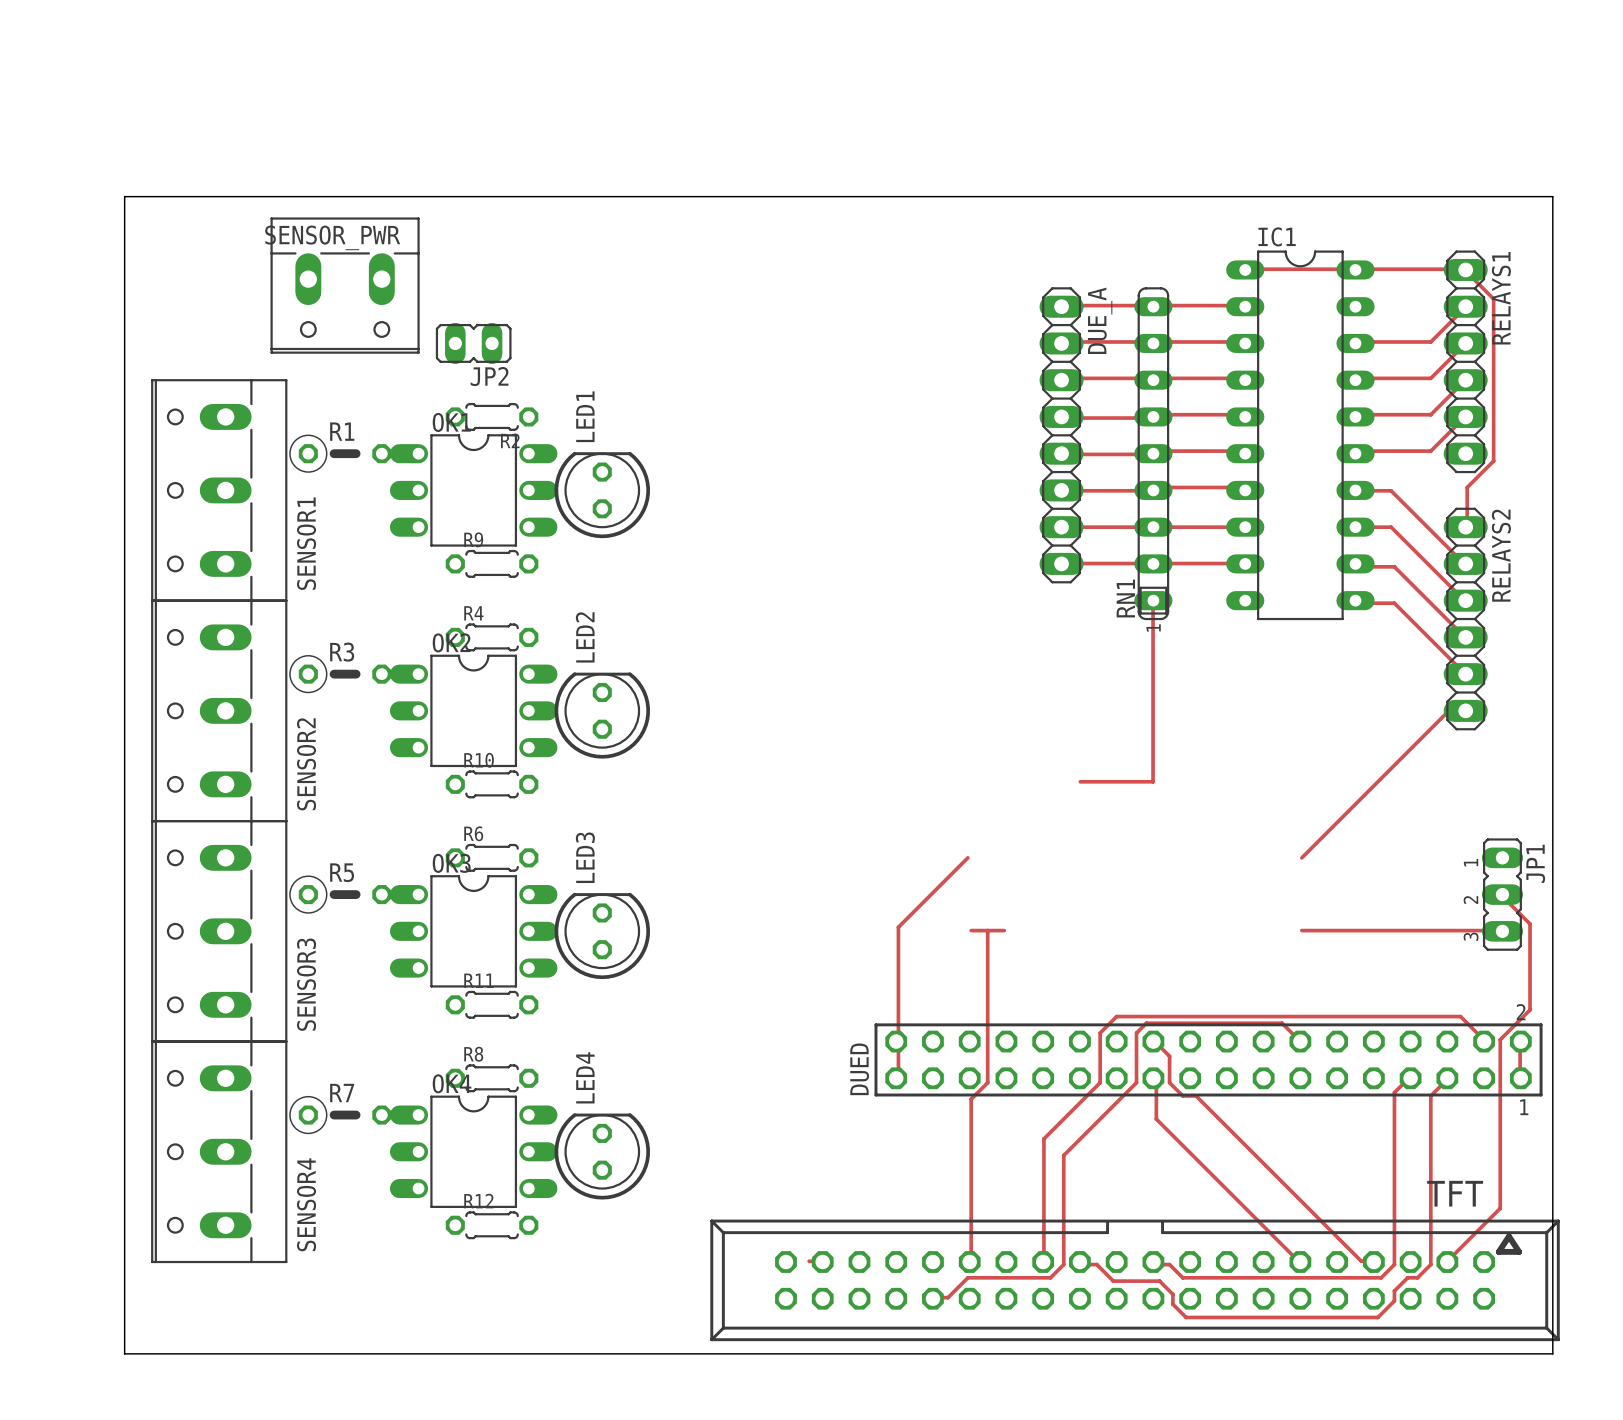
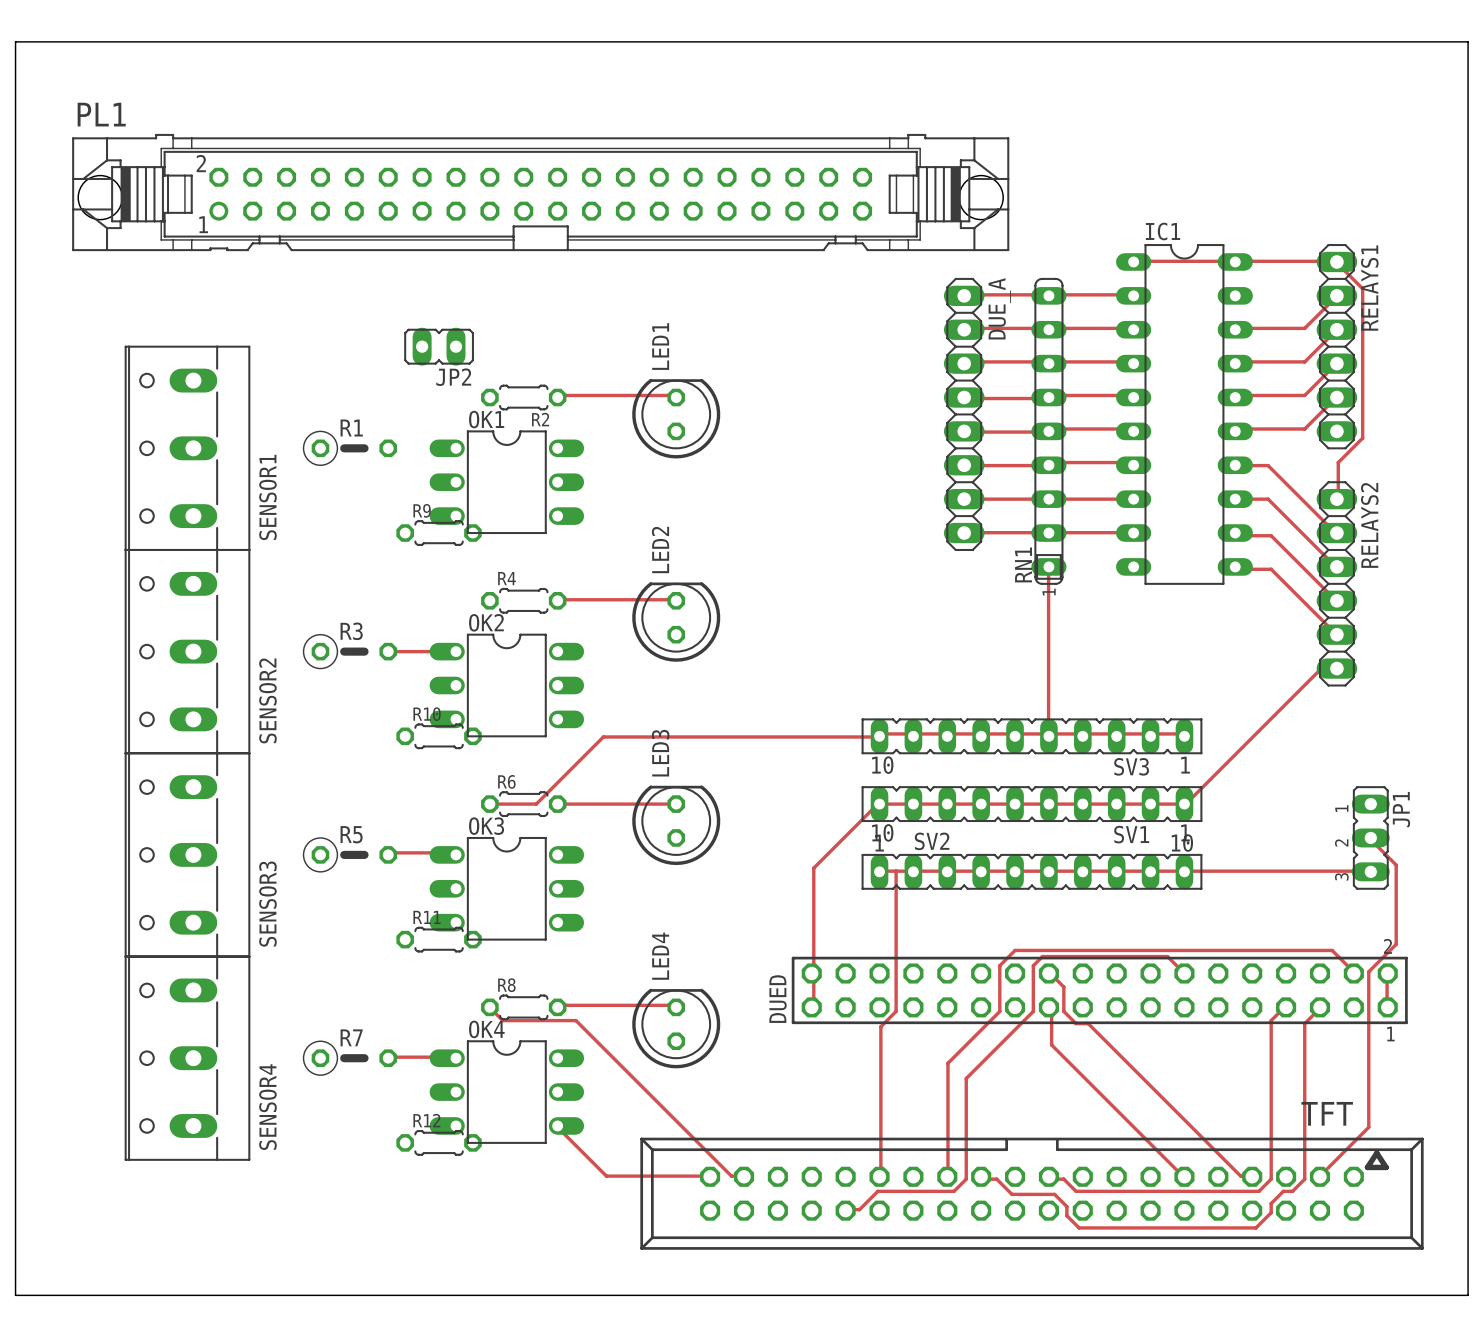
PL1: none -> (540, 192)
board edge: (124, 196) (1552, 196) (1552, 1353) (124, 1353) (124, 196) -> (15, 41) (15, 1295) (1468, 1295) (1468, 41) (15, 41)
SENSOR_PWR: (345, 285) -> none
JP2 position: (473, 343) -> (439, 346)
R2 position: (492, 416) -> (523, 397)
track: none -> (557, 397) (557, 395) (673, 395) (676, 397)
R1 position: (340, 453) -> (349, 448)
SENSOR1 position: (219, 490) -> (187, 448)
OK1 position: (473, 490) -> (506, 482)
LED1 position: (602, 495) -> (676, 418)
R4 position: (492, 637) -> (523, 600)
track: none -> (557, 600) (676, 600)
R3 position: (340, 674) -> (349, 651)
track: none -> (388, 651) (456, 651)
SENSOR2 position: (219, 710) -> (187, 651)
OK2 position: (473, 710) -> (506, 685)
LED2 position: (602, 715) -> (676, 621)
track: none -> (981, 733) (981, 736) (978, 733) (947, 733) (947, 736) (944, 733) (914, 733) (913, 736) (911, 733) (880, 733) (877, 737) (603, 737) (536, 804) (489, 804)
track: none -> (1048, 733) (1048, 736) (1051, 733) (1082, 733) (1082, 736) (1085, 733) (1115, 733) (1116, 736) (1118, 733) (1149, 733) (1150, 736) (1152, 733) (1182, 733) (1184, 736)
SV3: none -> (1031, 736)
R6 position: (492, 857) -> (523, 804)
track: none -> (557, 804) (676, 804)
track: none -> (877, 804) (1185, 804)
SV1: none -> (1031, 804)
R5 position: (340, 894) -> (349, 854)
track: none -> (388, 854) (389, 852) (453, 852) (456, 854)
track: none -> (911, 871) (1185, 871)
SENSOR3 position: (219, 931) -> (187, 854)
OK3 position: (473, 931) -> (506, 888)
SV2: none -> (1031, 871)
LED3 position: (602, 935) -> (676, 825)
R8 position: (492, 1078) -> (523, 1007)
track: none -> (489, 1007) (502, 1020) (575, 1020) (731, 1176)
track: none -> (557, 1007) (557, 1005) (673, 1005) (676, 1007)
R7 position: (340, 1115) -> (349, 1058)
track: none -> (388, 1058) (456, 1058)
SENSOR4 position: (219, 1151) -> (187, 1058)
OK4 position: (473, 1151) -> (506, 1092)
LED4 position: (602, 1156) -> (676, 1028)
track: none -> (557, 1125) (606, 1176) (710, 1176)

